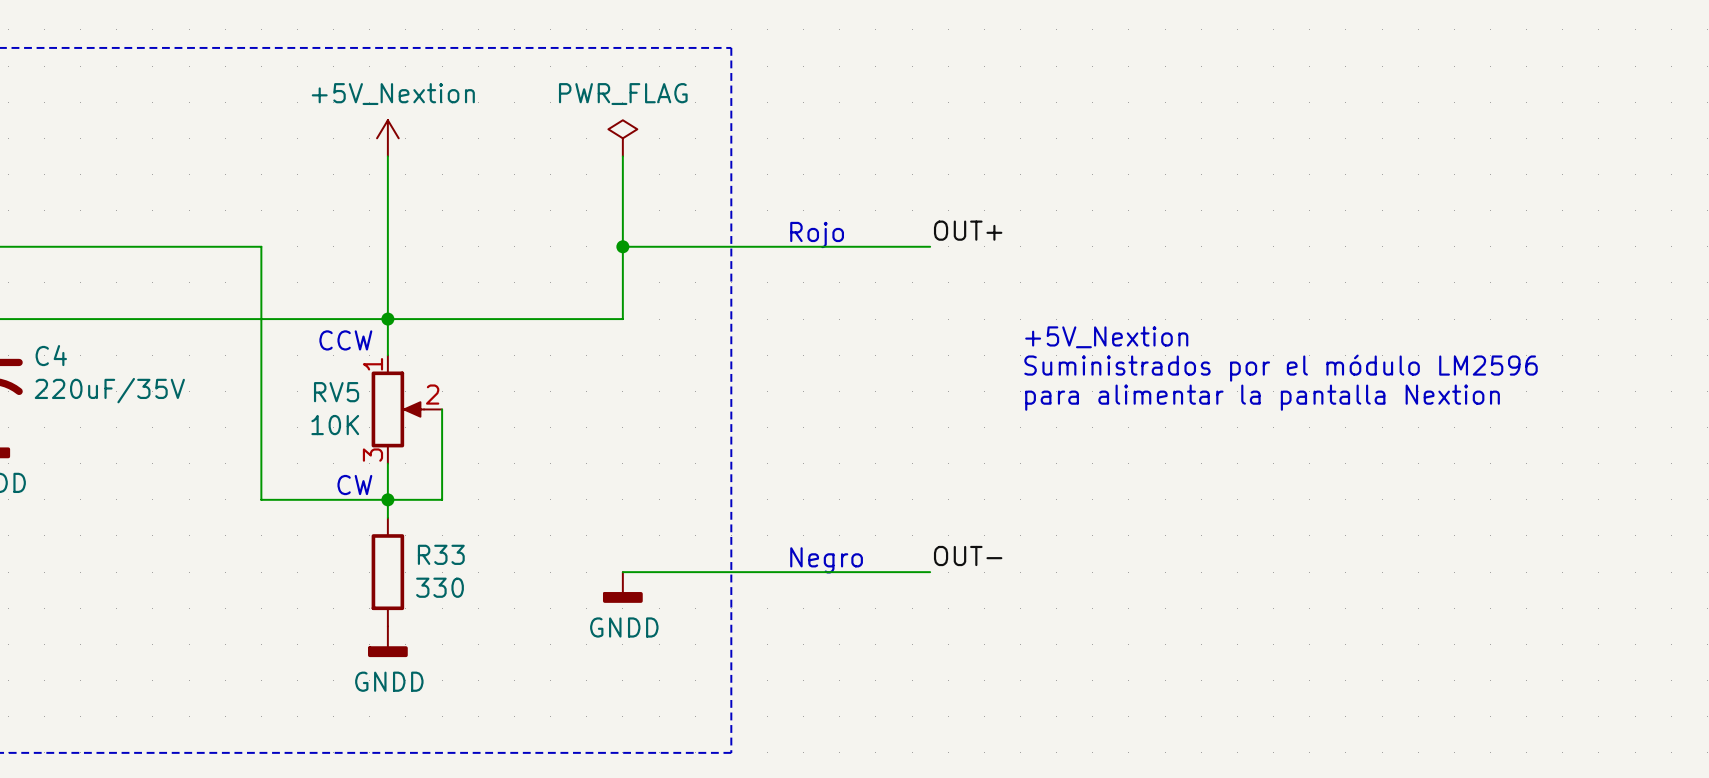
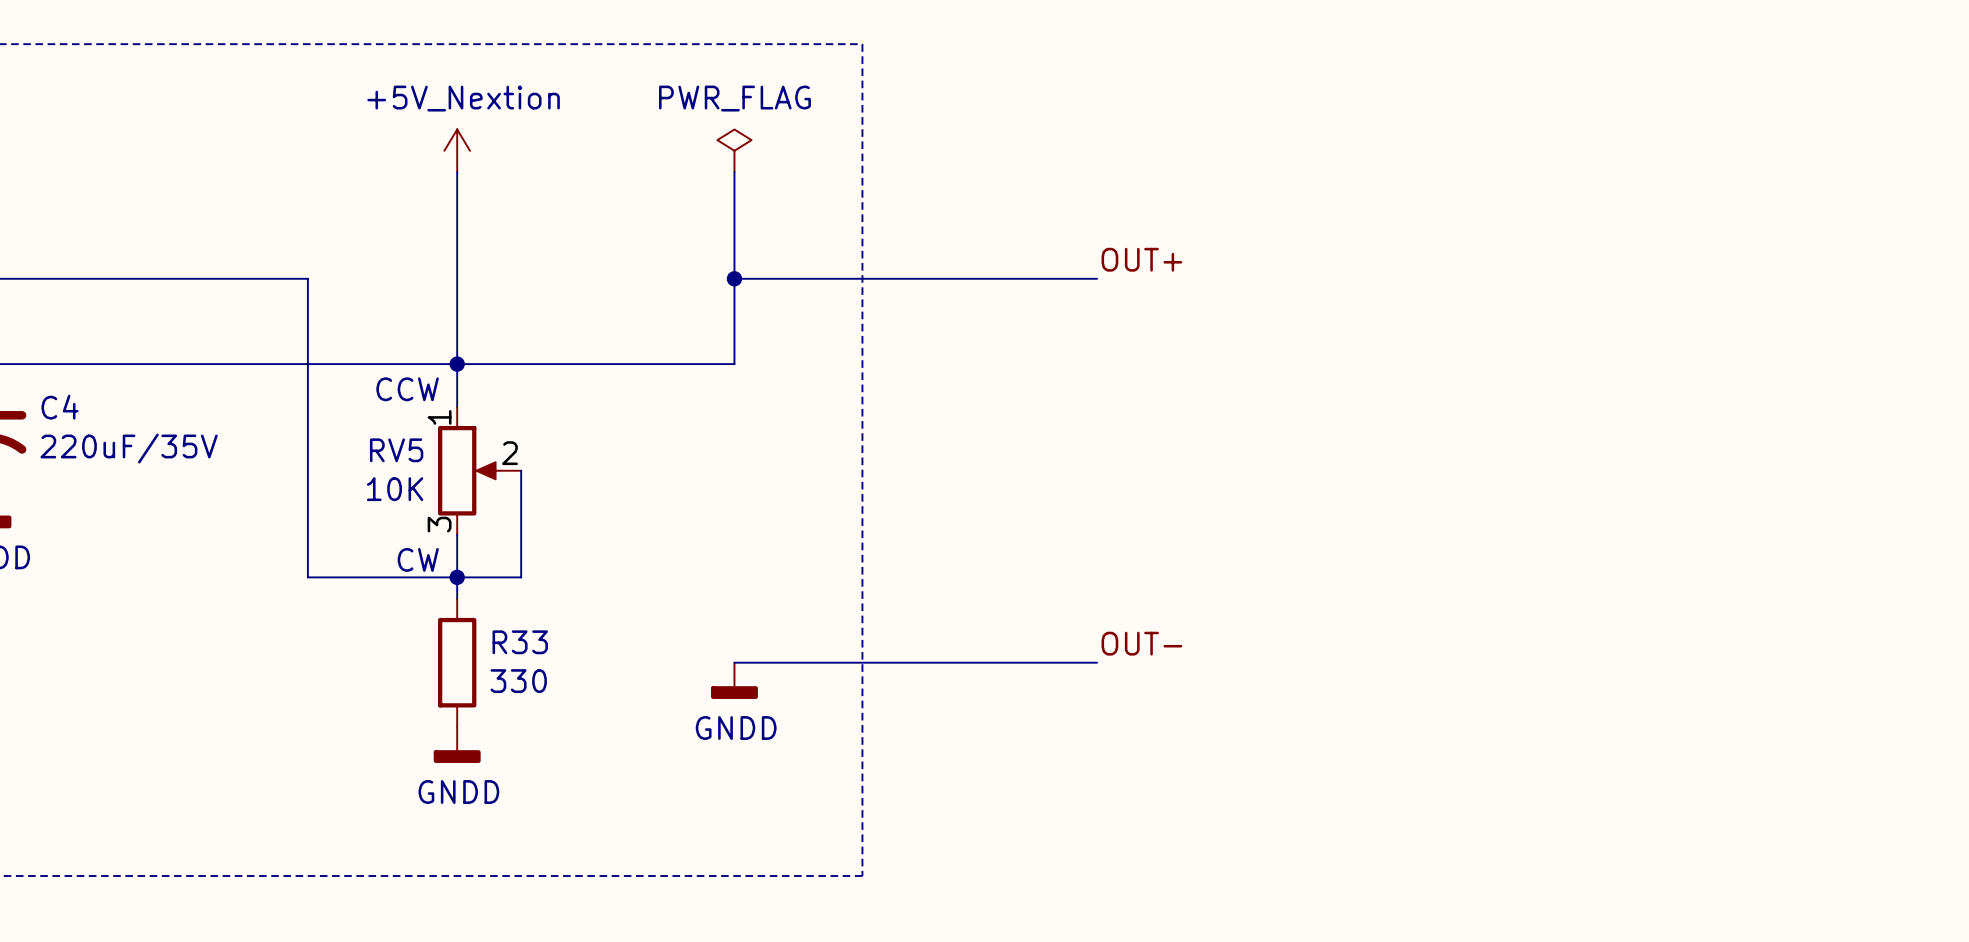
text: Rojo (817, 234) -> none
text: +5V_Nextion (1106, 337) -> none
text: Suministrados por el módulo LM2596 (1281, 368) -> none
text: para alimentar la pantalla Nextion (1262, 397) -> none
text: Negro (826, 560) -> none

